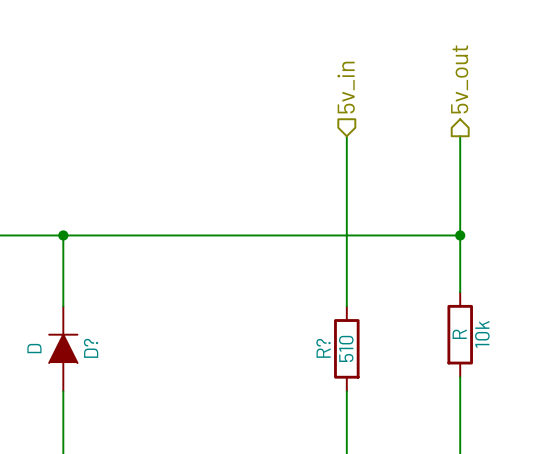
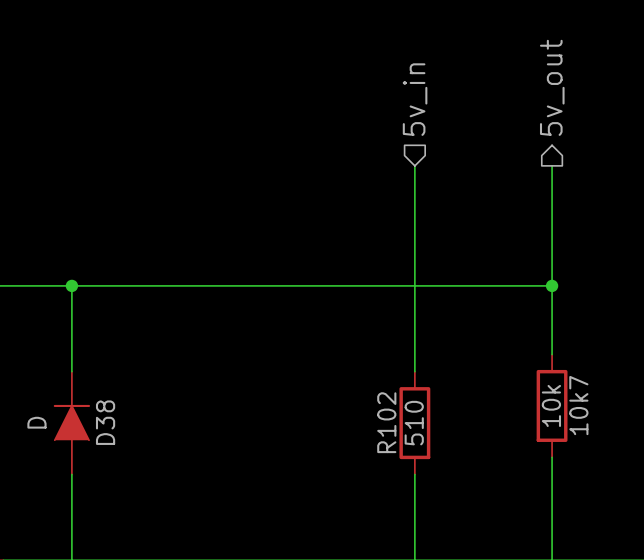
10k value: R (459, 334) -> 10k (551, 405)
10k name: 10k (482, 334) -> 10k7 (578, 405)
D? name: D? (91, 348) -> D38 (105, 422)
R? name: R? (323, 348) -> R102 (386, 422)

